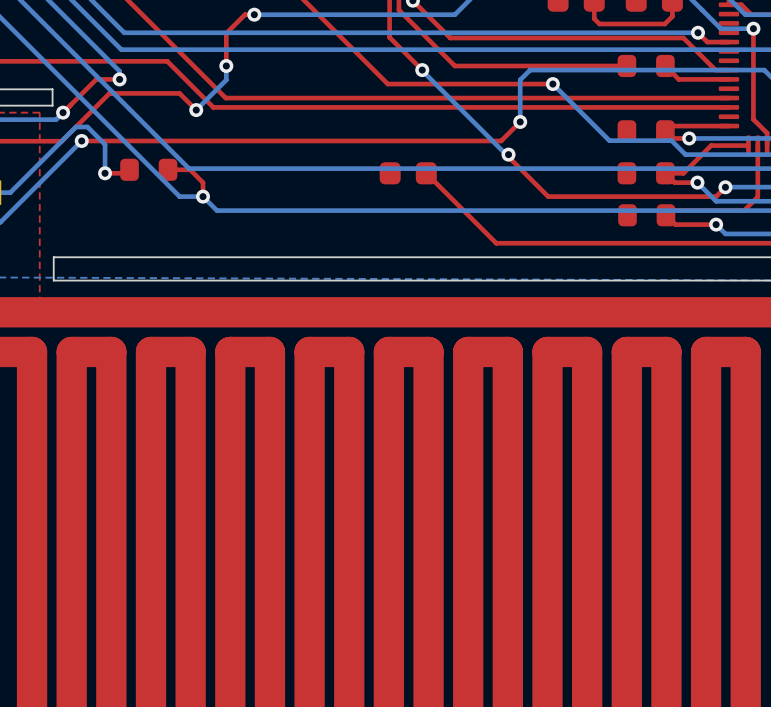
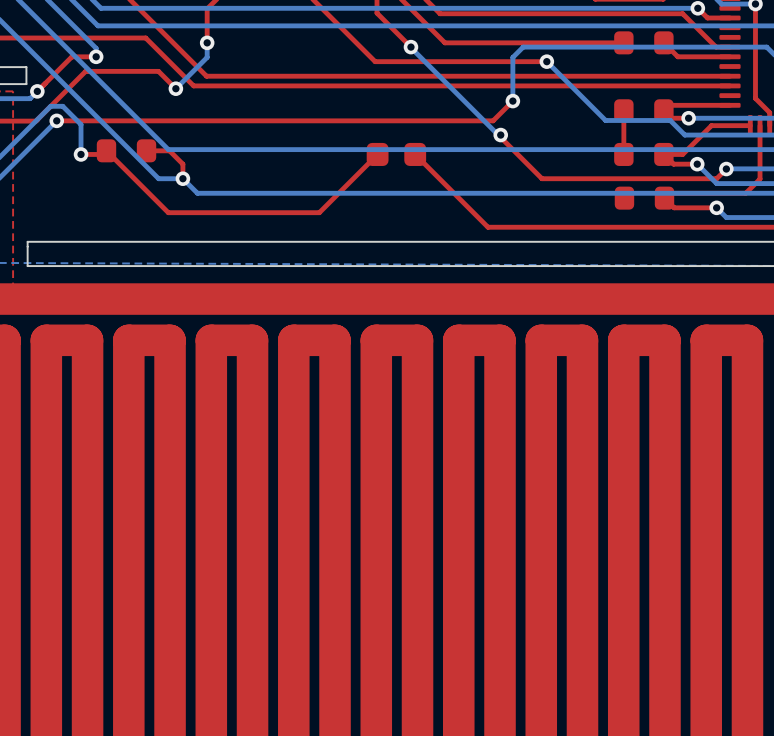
top track: none -> (623, 110) (623, 154)
top track: none -> (106, 150) (168, 212) (319, 212) (377, 154)

